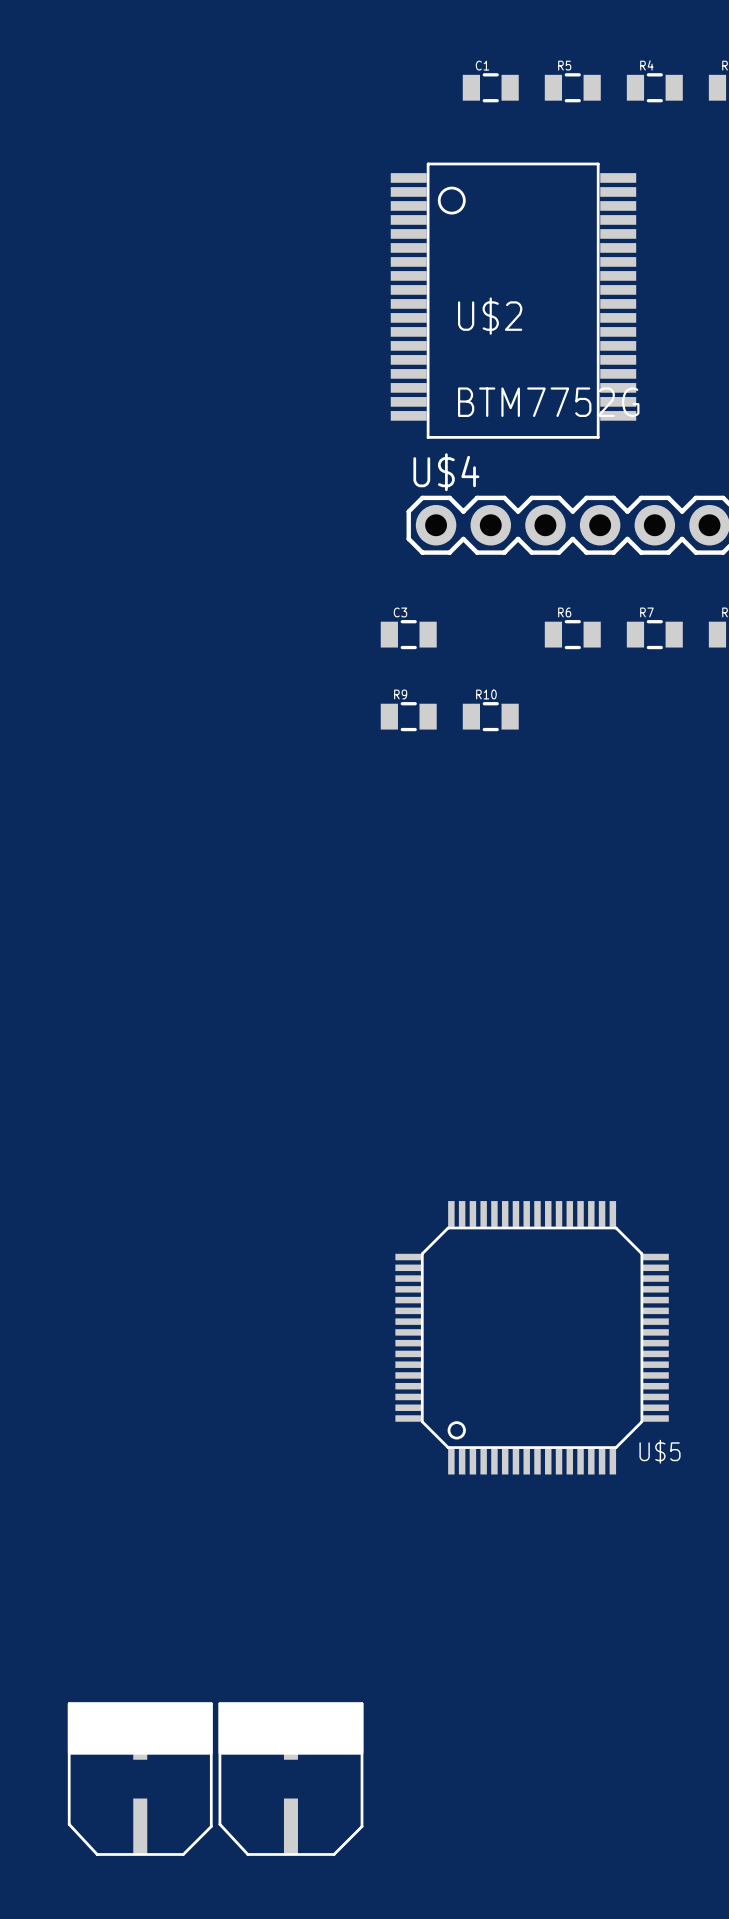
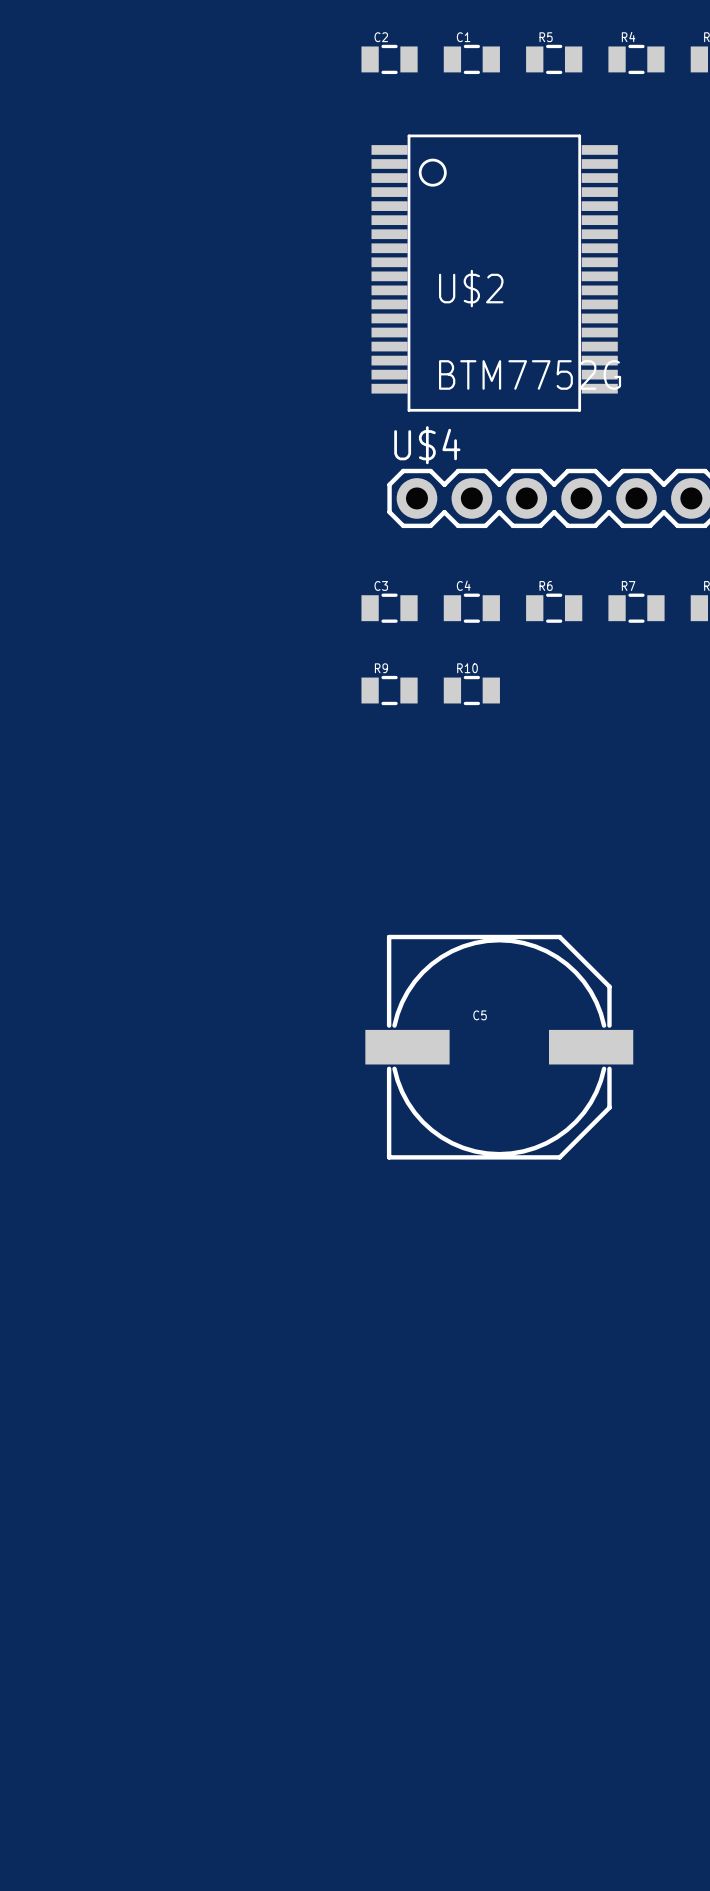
C2: none -> (389, 59)
C4: none -> (471, 608)
C5: none -> (499, 1047)
U$5: (532, 1337) -> none
part: (140, 1779) -> none
part: (290, 1779) -> none

